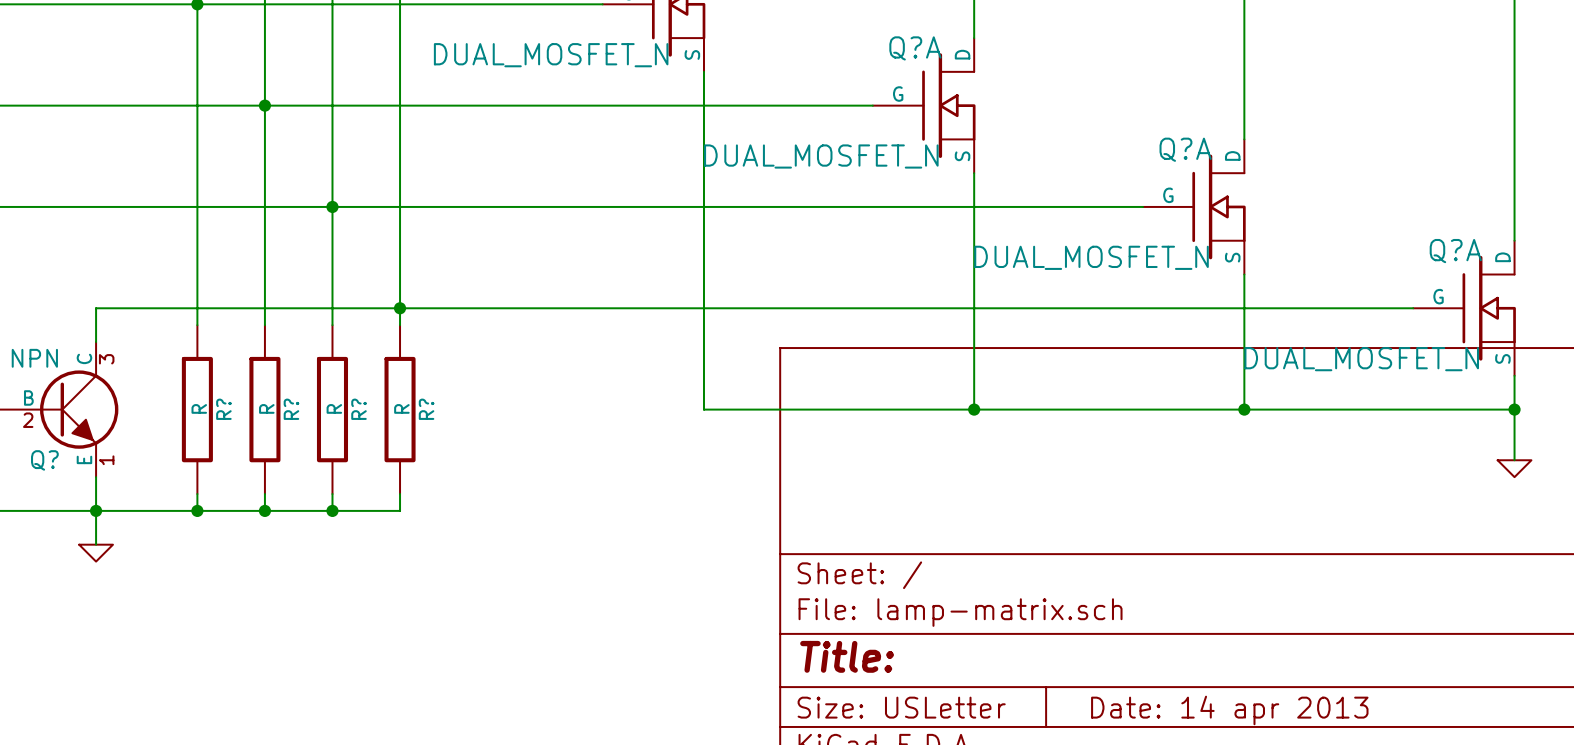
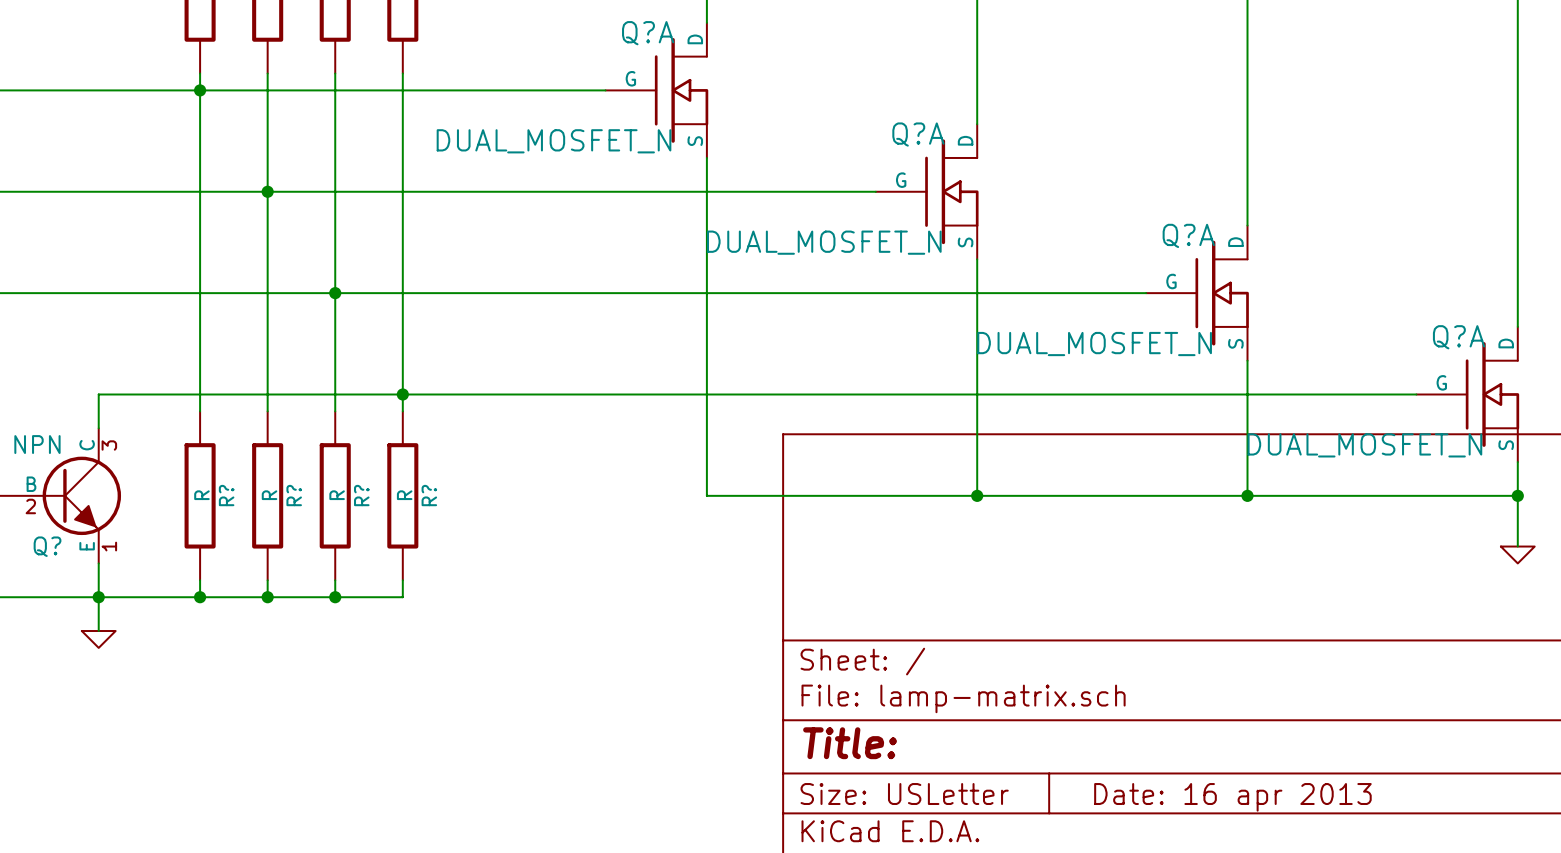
title block: Date: 14 apr 2013 (1229, 710) -> Date: 16 apr 2013 (1232, 797)

